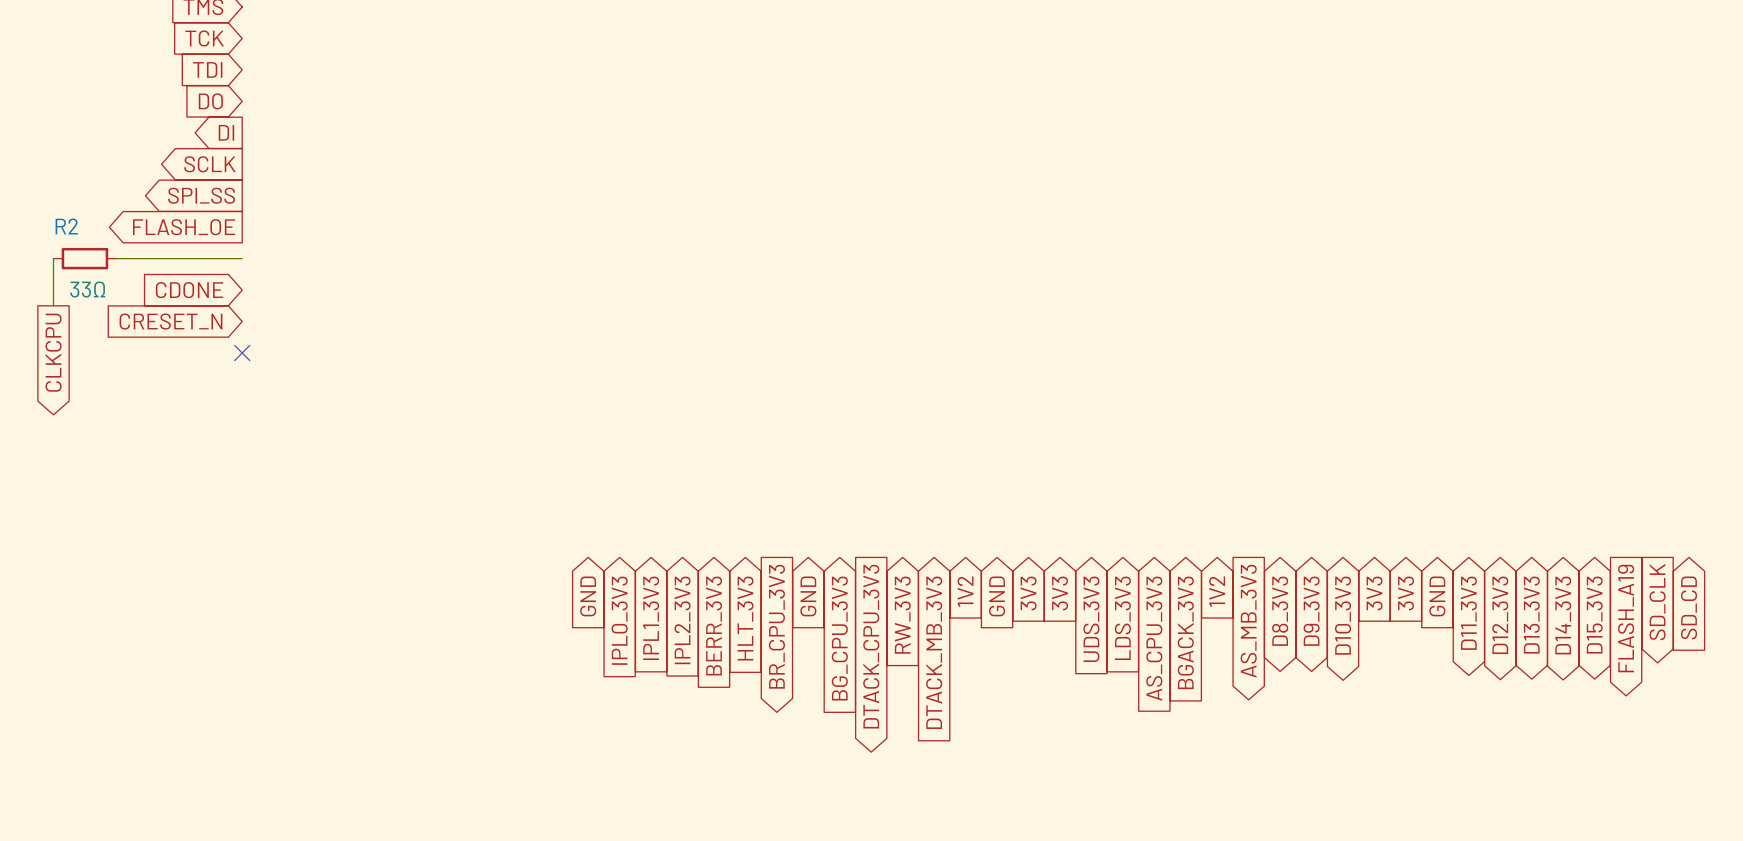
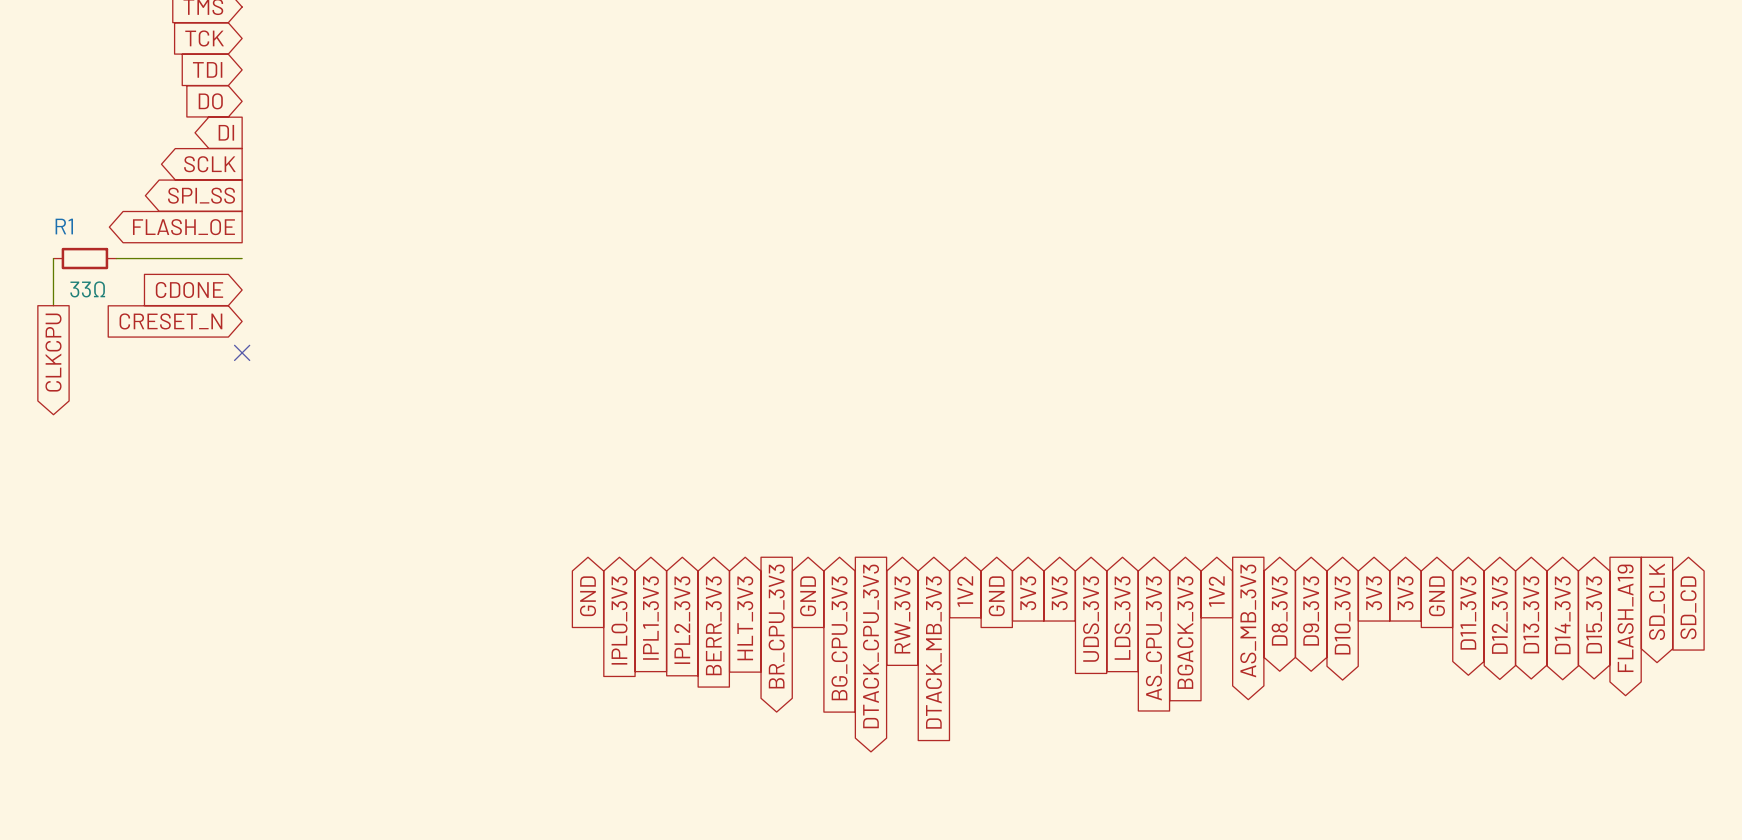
R2 name: R2 (66, 226) -> R1 (64, 226)

